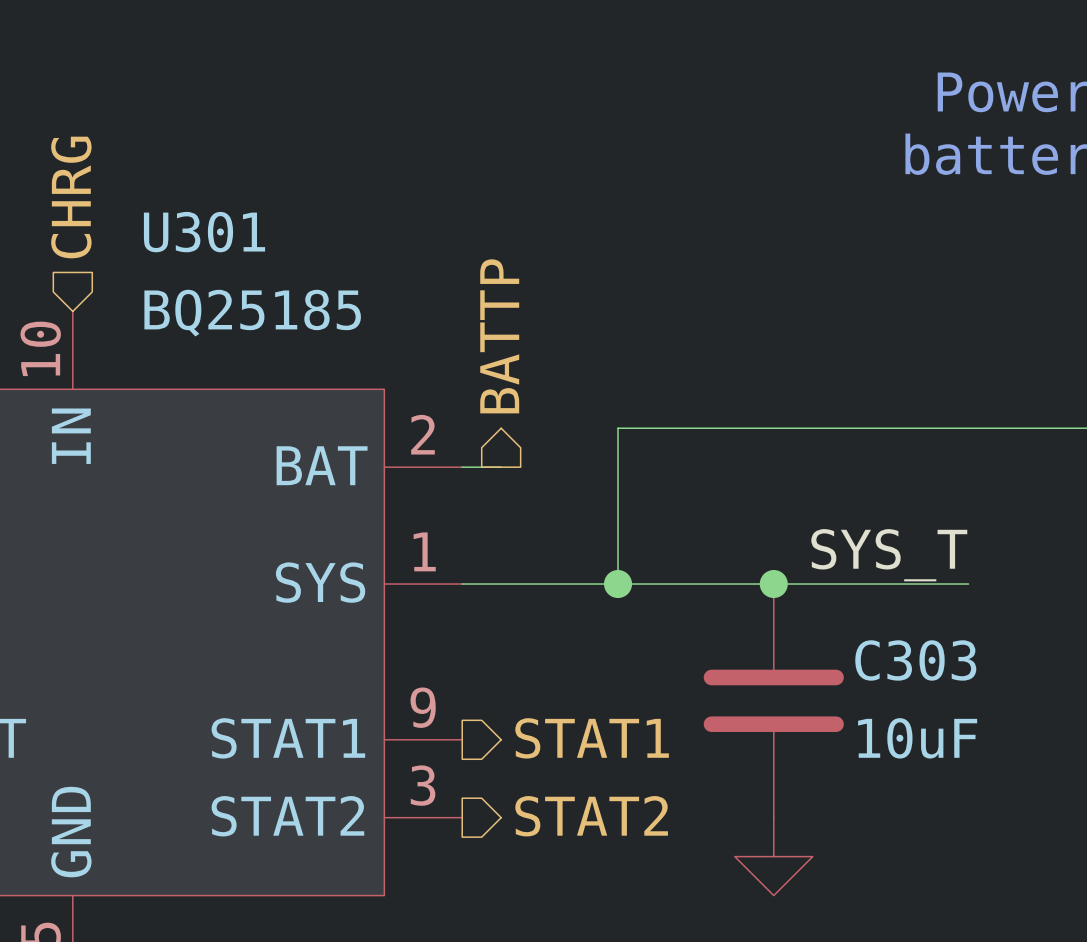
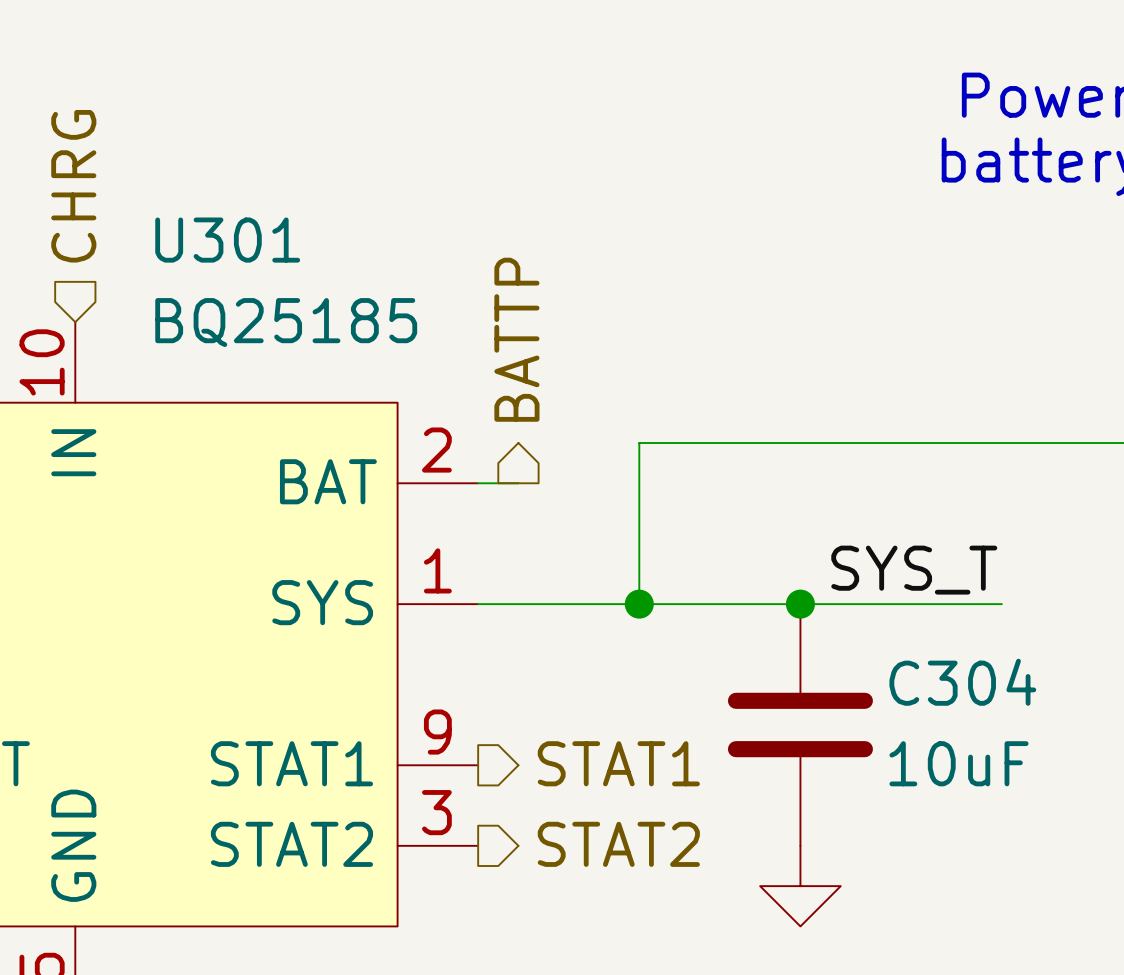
C303 name: C303 (915, 660) -> C304 (962, 682)

